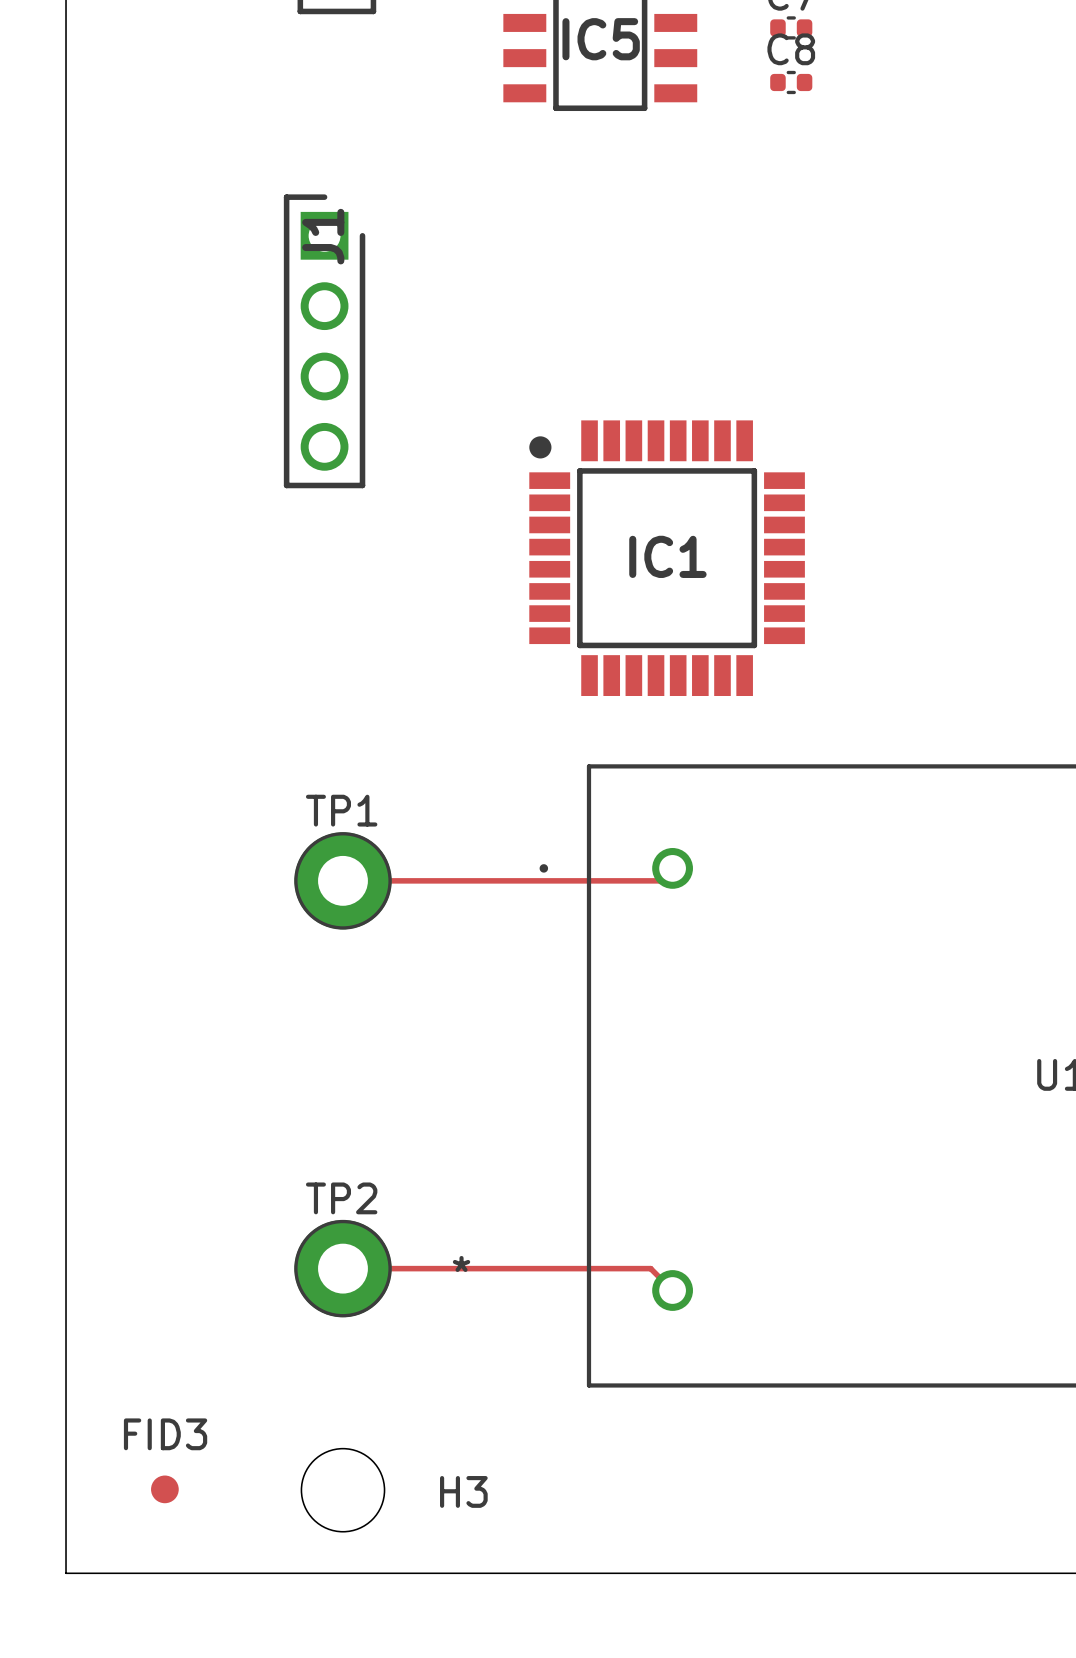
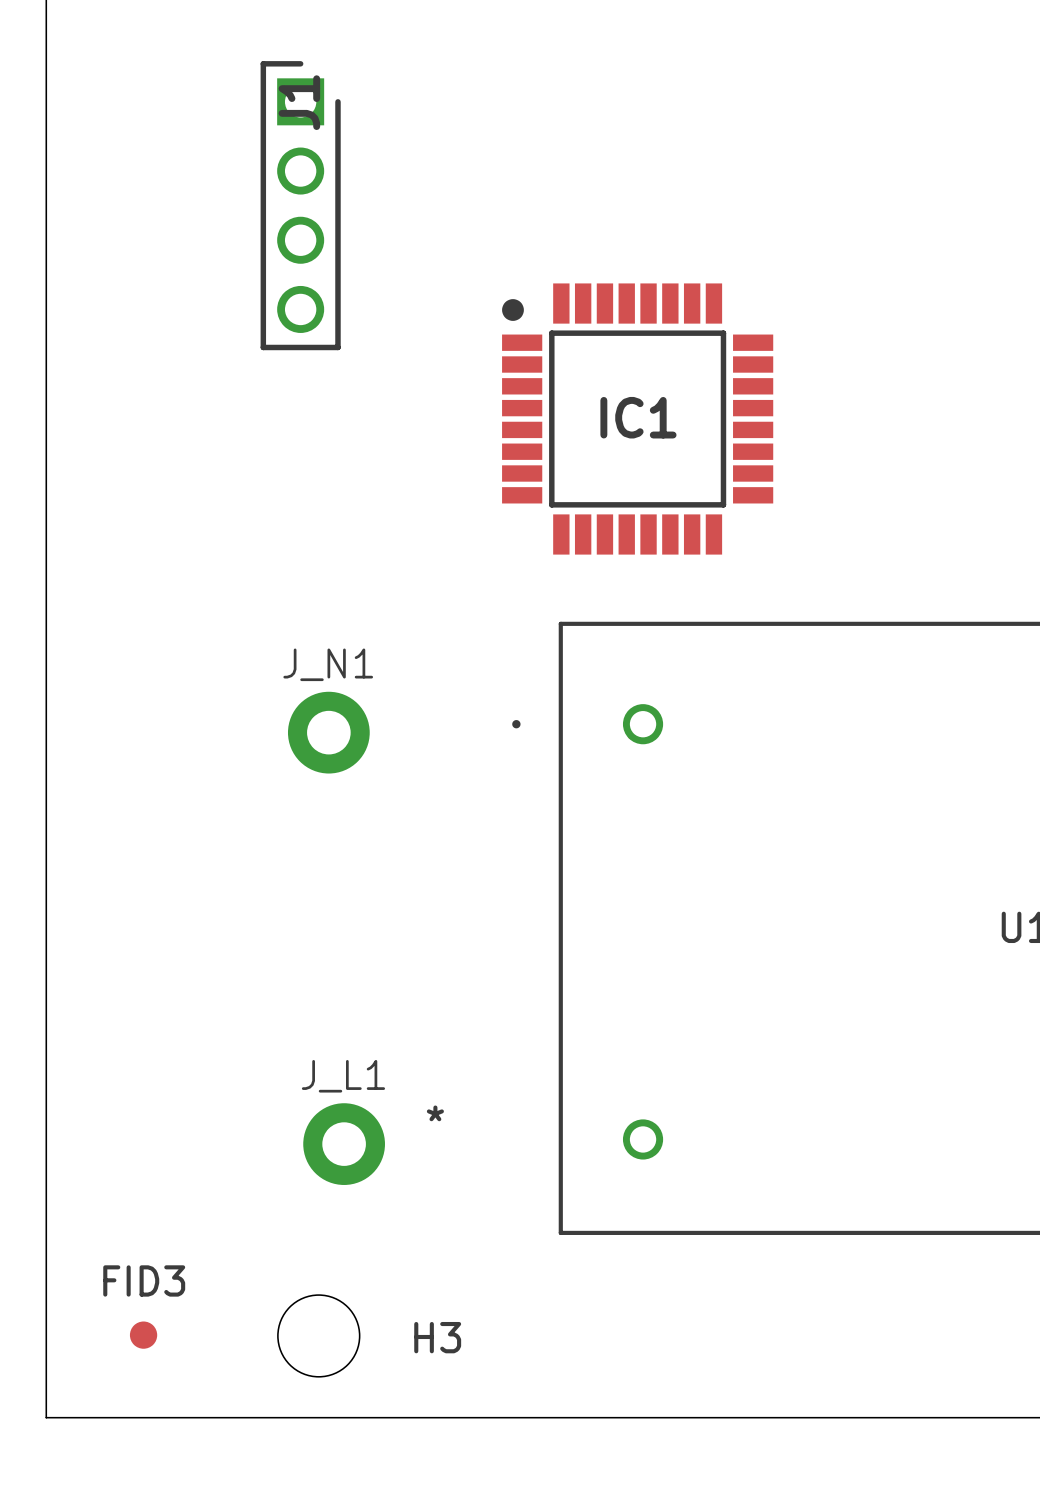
J_N1: none -> (328, 732)
track: (342, 880) (660, 880) -> none
TP1: (342, 880) -> none
track: (342, 1268) (650, 1268) (672, 1290) -> none
TP2: (342, 1268) -> none
J_L1: none -> (344, 1144)

